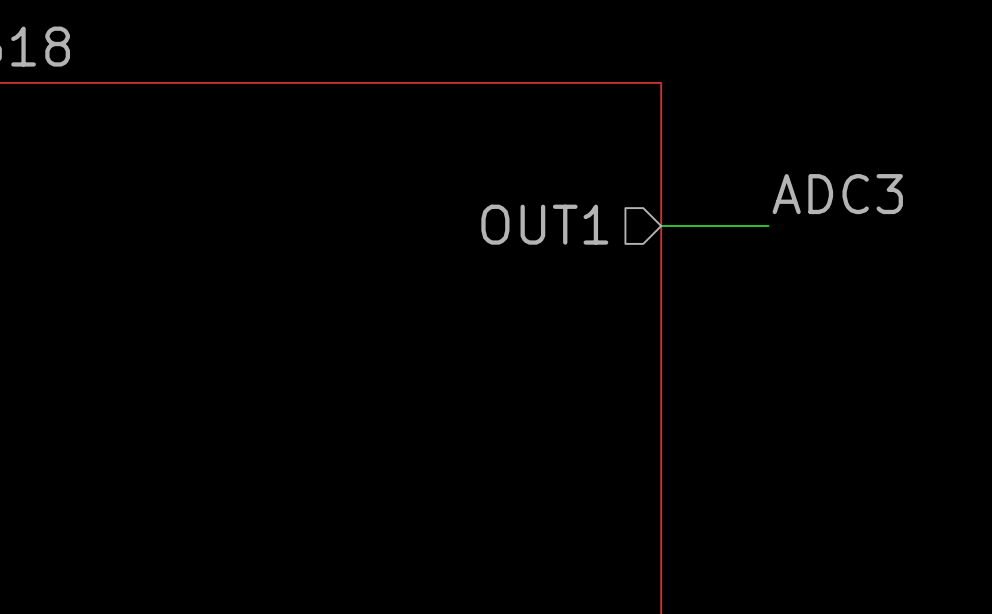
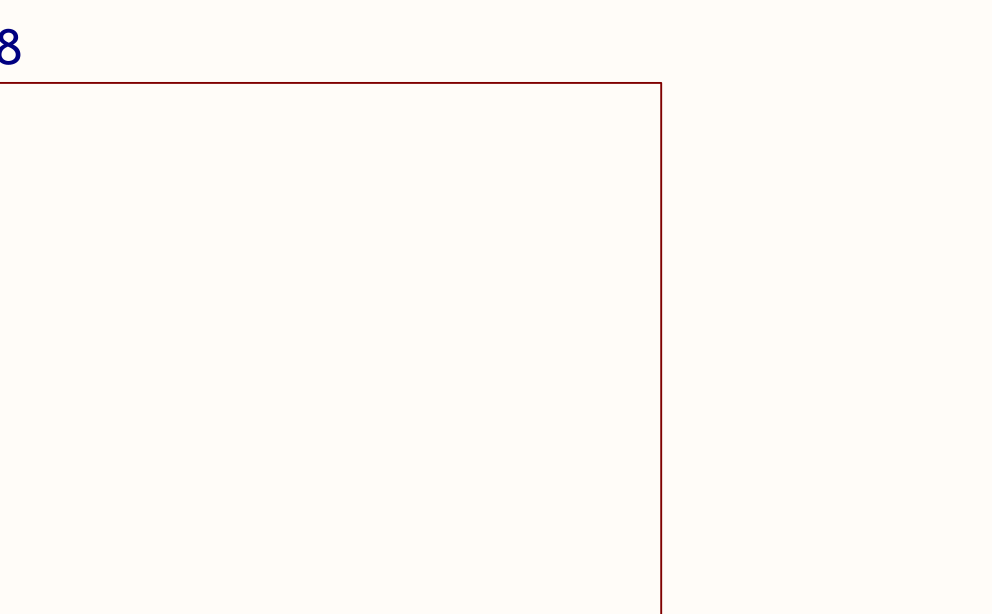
label: ADC3 (837, 194) -> none
sheet pin: OUT1 (544, 224) -> none
wire: (661, 226) (768, 226) -> none

